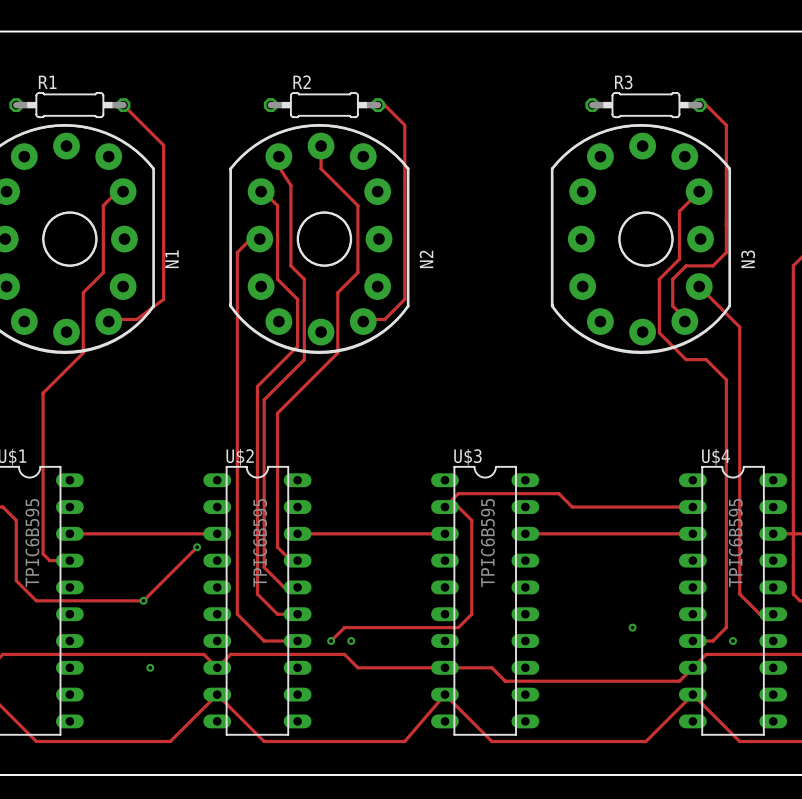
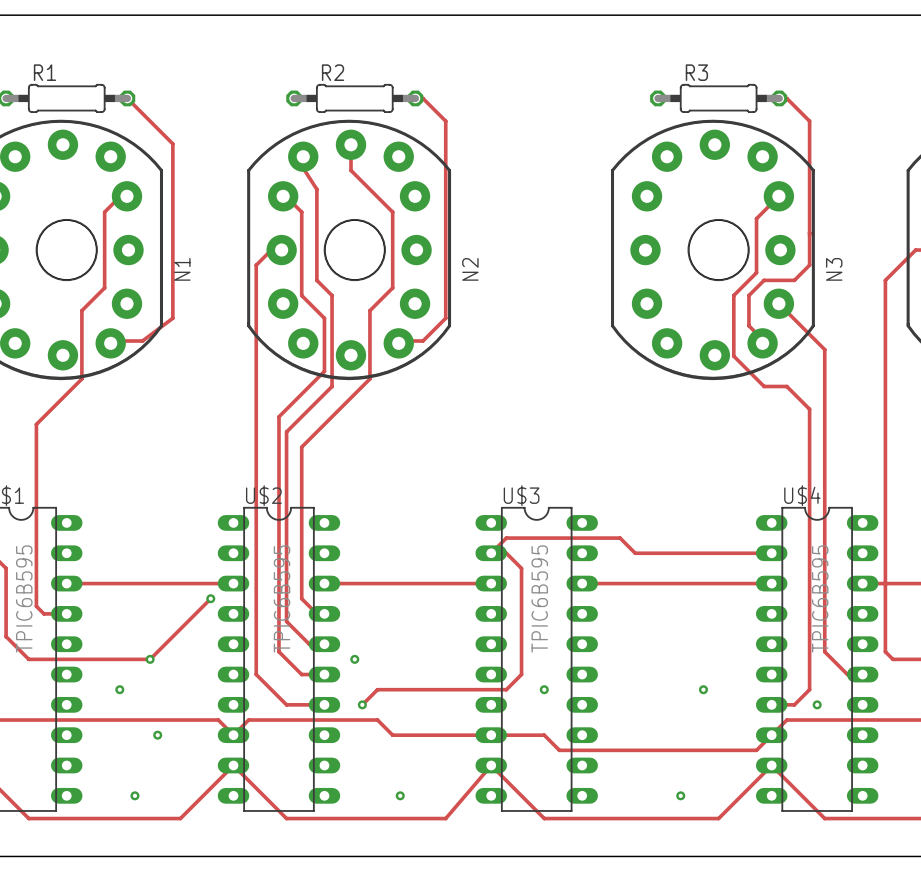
via: none -> (354, 659)
via: none -> (119, 689)
via: none -> (544, 689)
via: (351, 641) -> none
via: none -> (134, 795)
via: none -> (400, 795)
via: none -> (680, 795)

